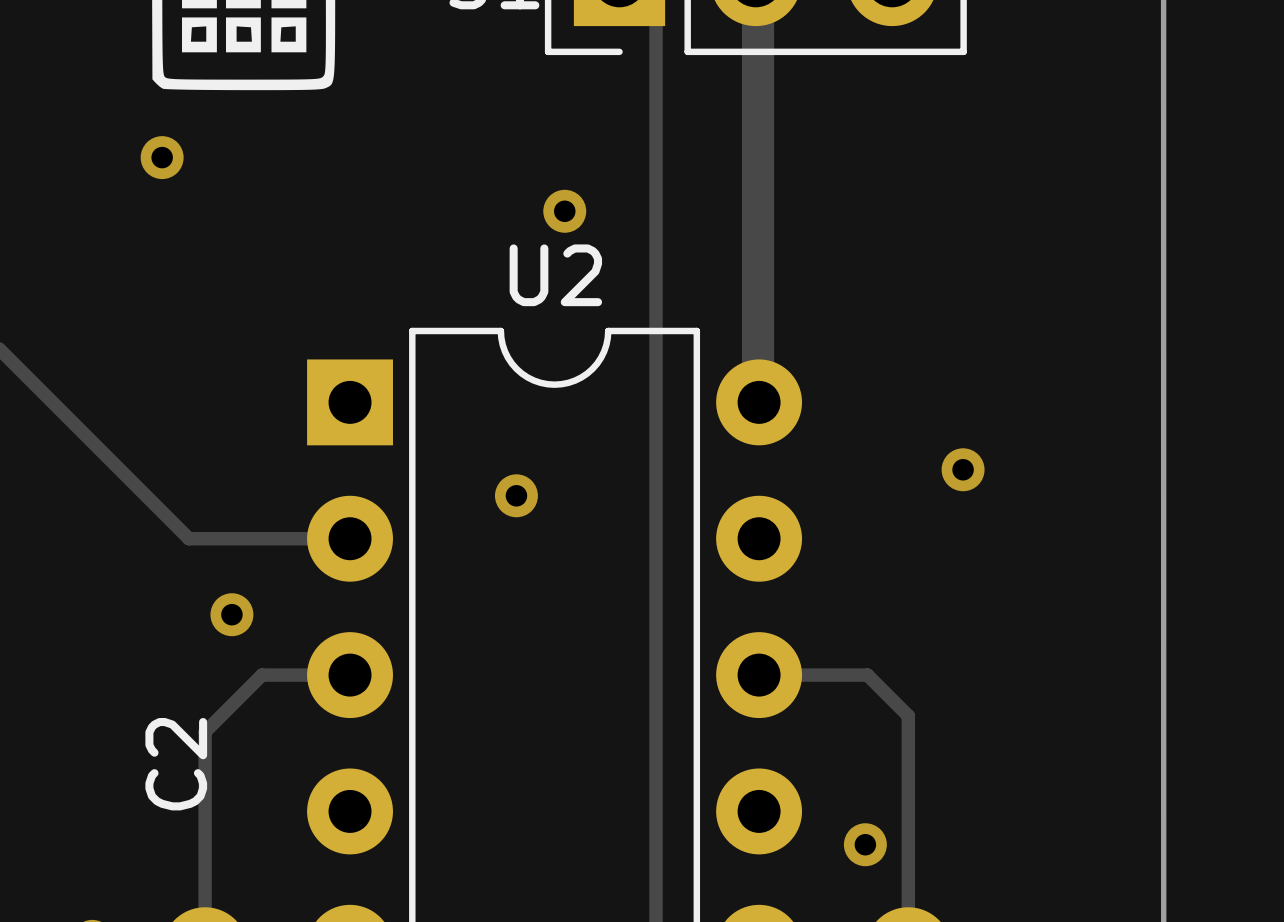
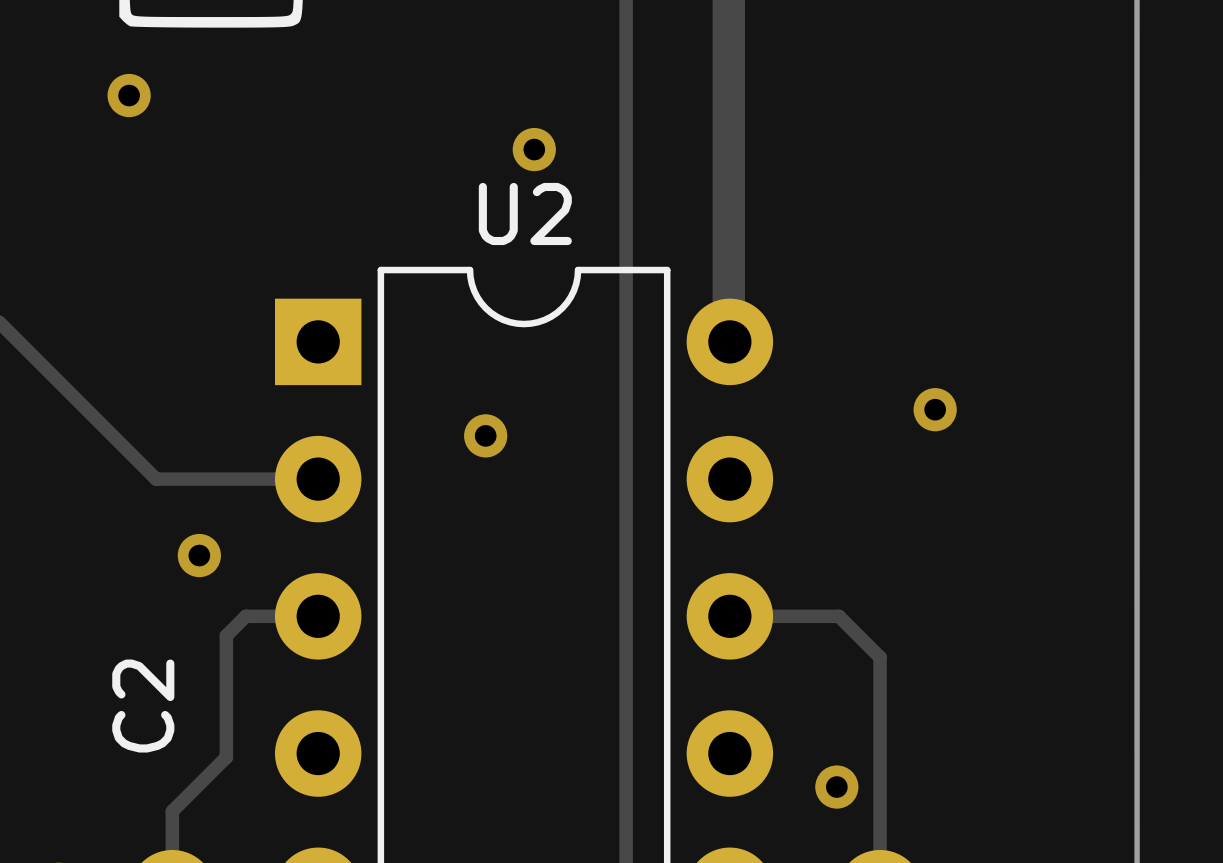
track: (278, 675) (261, 675) (205, 731) (205, 868) -> (245, 616) (226, 635) (226, 757) (172, 811)

